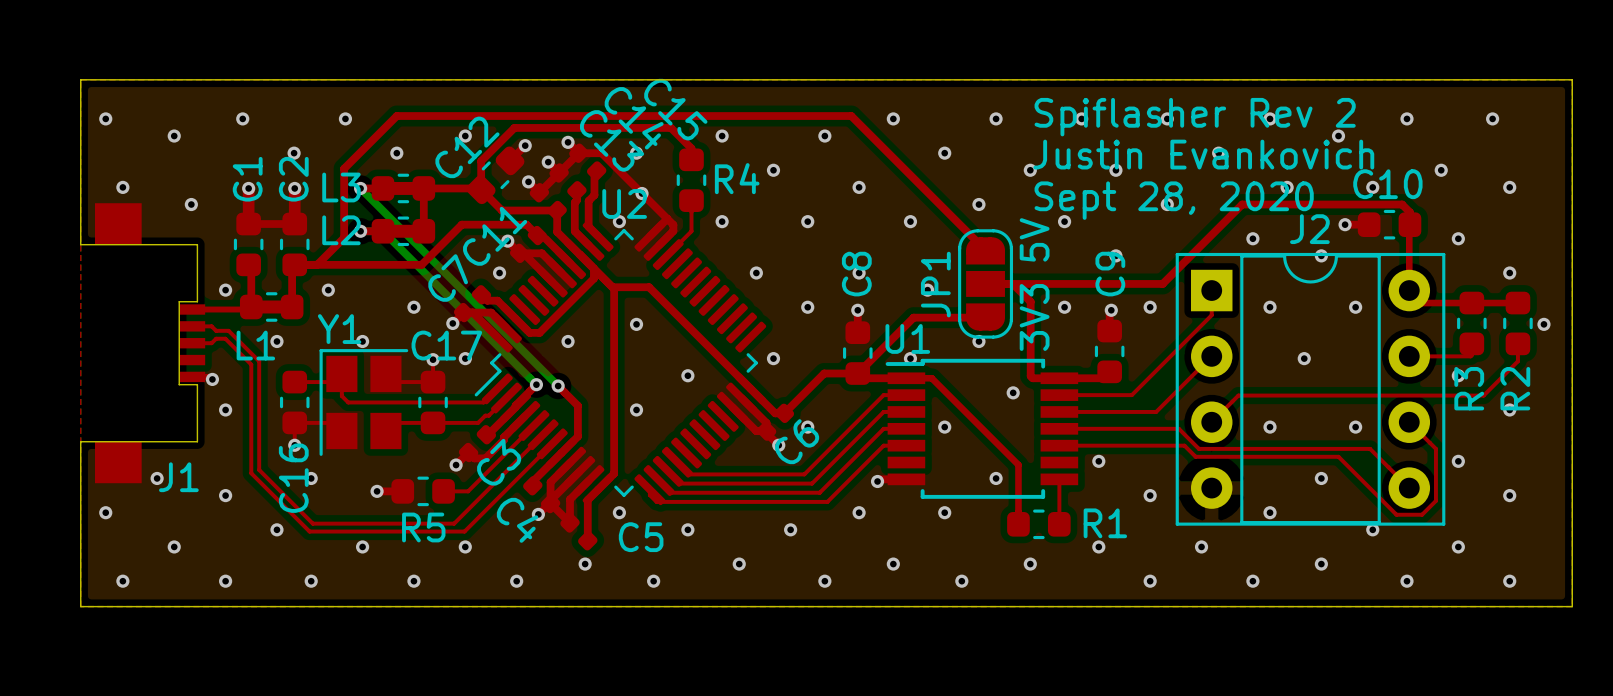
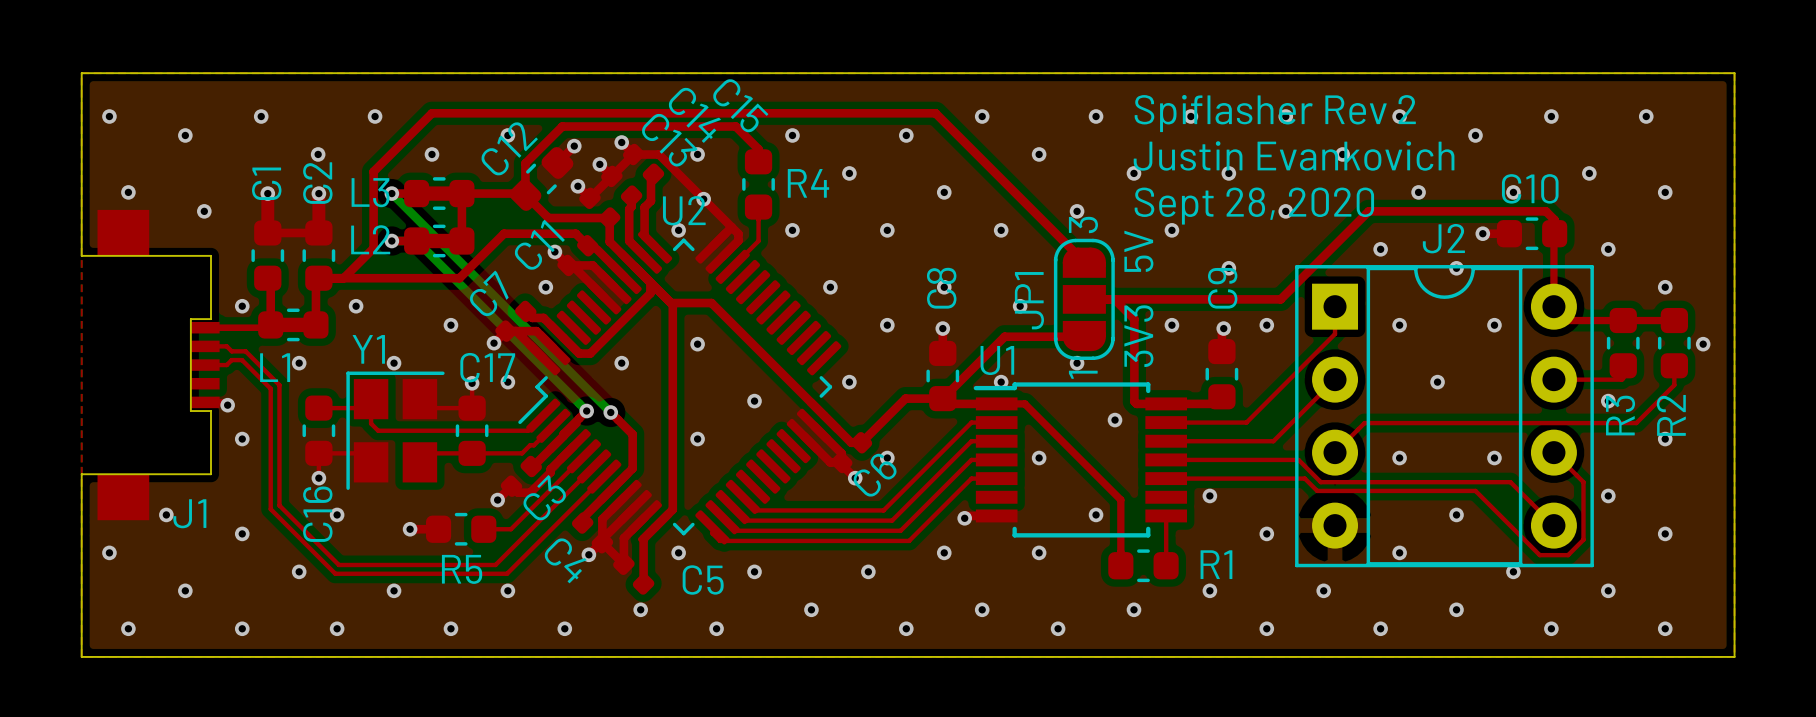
JP1 text: none -> 3 (1083, 224)
JP1 text: none -> 1 (1083, 374)

